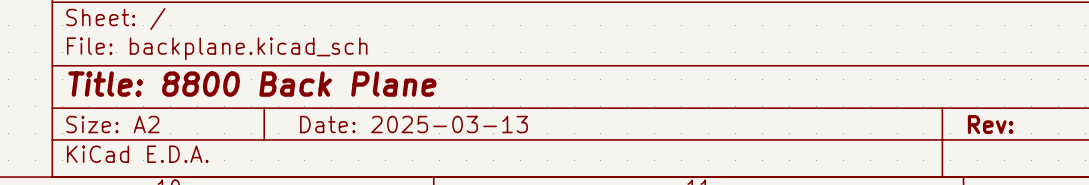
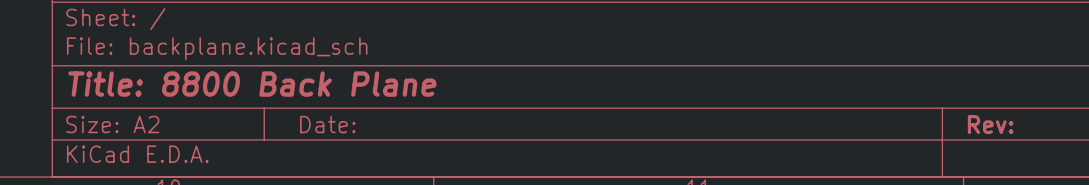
title block: Date: 2025-03-13 (414, 124) -> Date: (327, 124)

